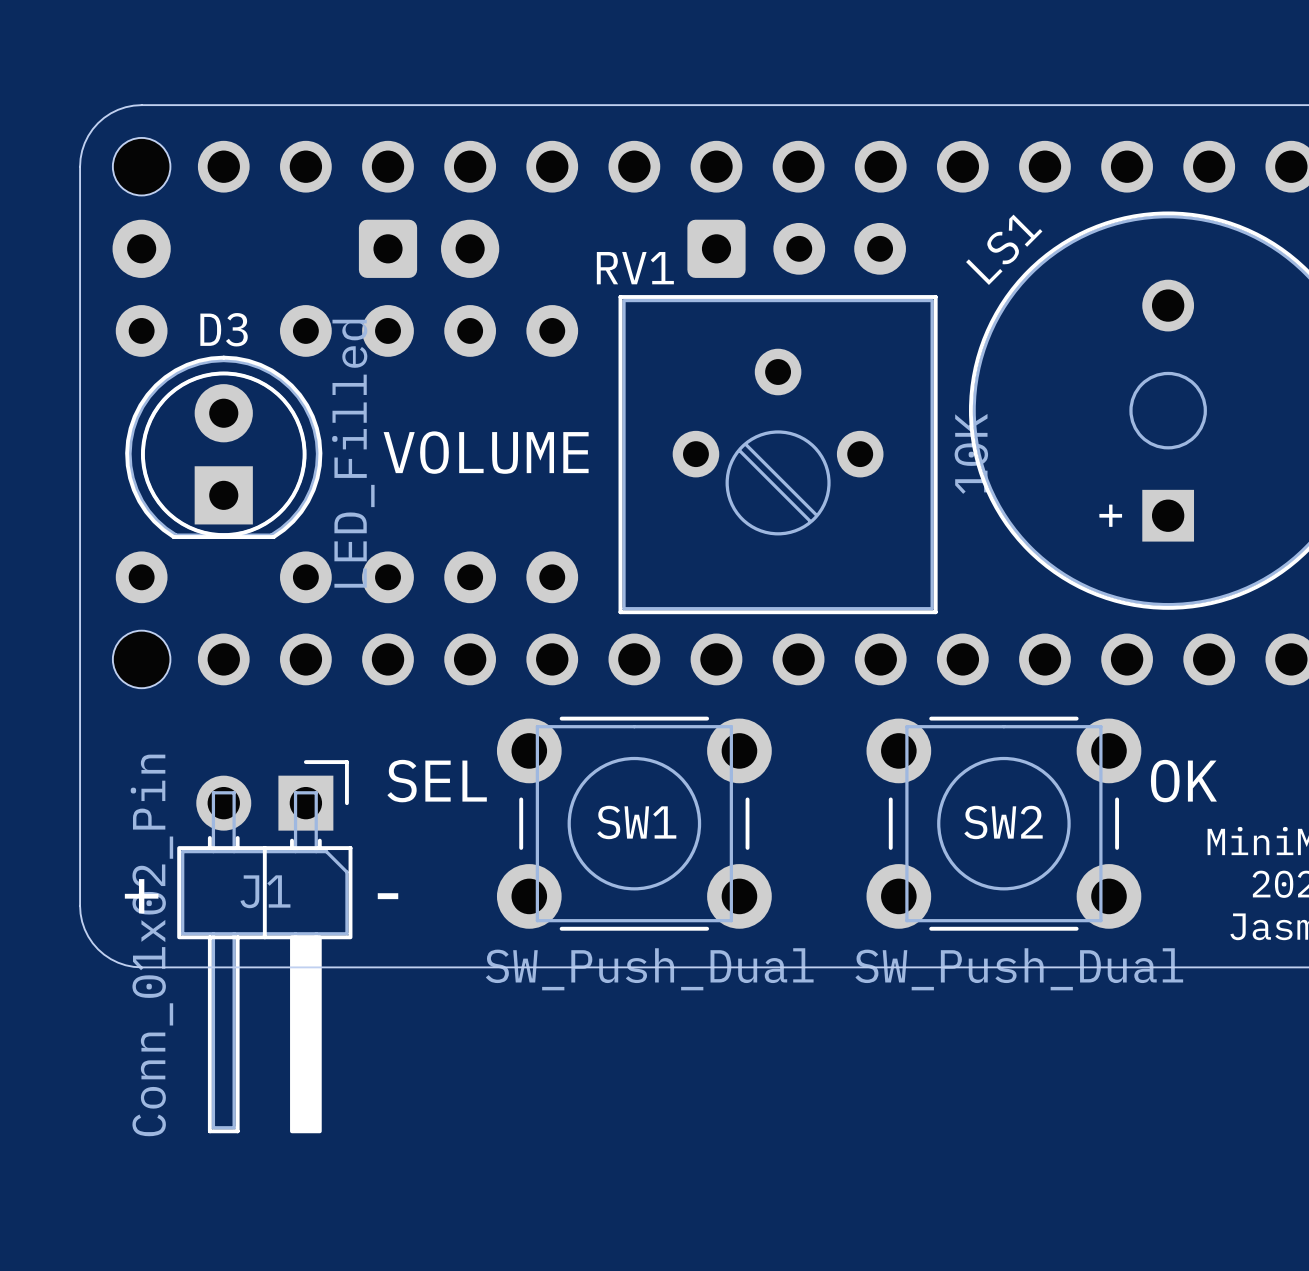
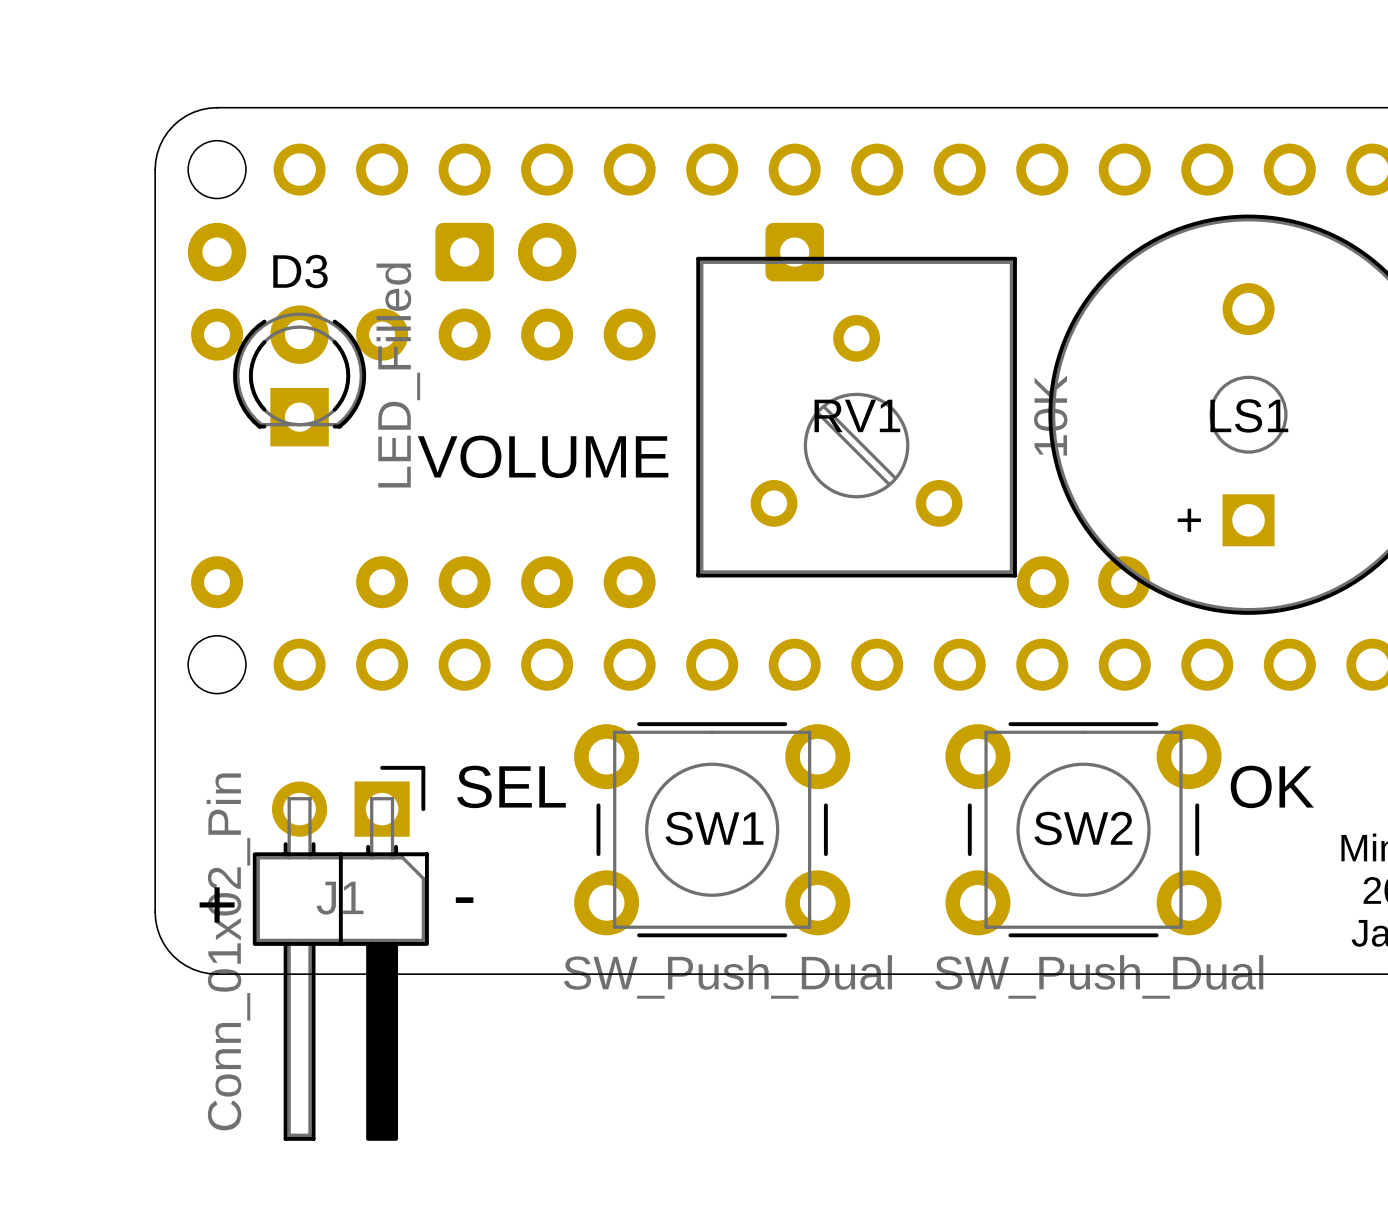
part position: (839, 248) -> (1083, 582)
LS1 name rotation: 0° (1004, 249) -> 45° clockwise (1249, 415)
LS1 name position: LS1 (1004, 249) -> LS1 (1249, 415)
RV1 name position: RV1 (635, 268) -> RV1 (857, 415)
RV1 footprint: [618, 295, 938, 615] -> [696, 256, 1017, 578]
D3 footprint: [125, 355, 323, 540] -> [233, 305, 367, 447]

